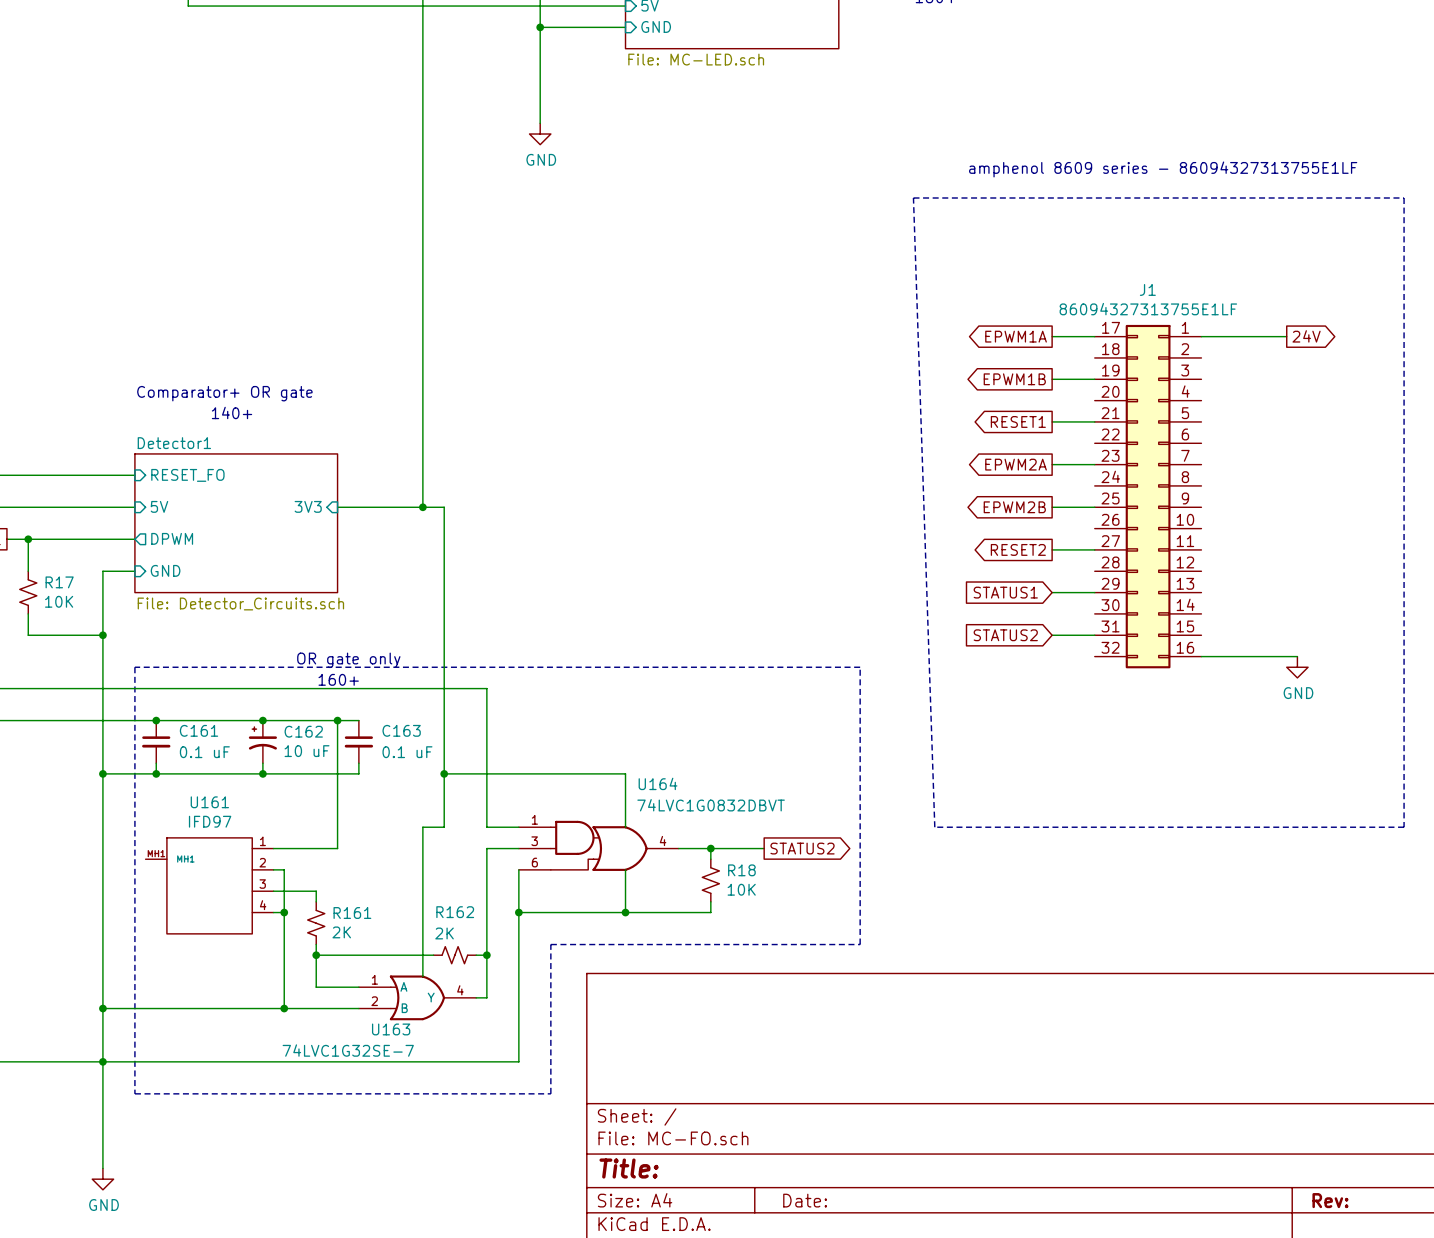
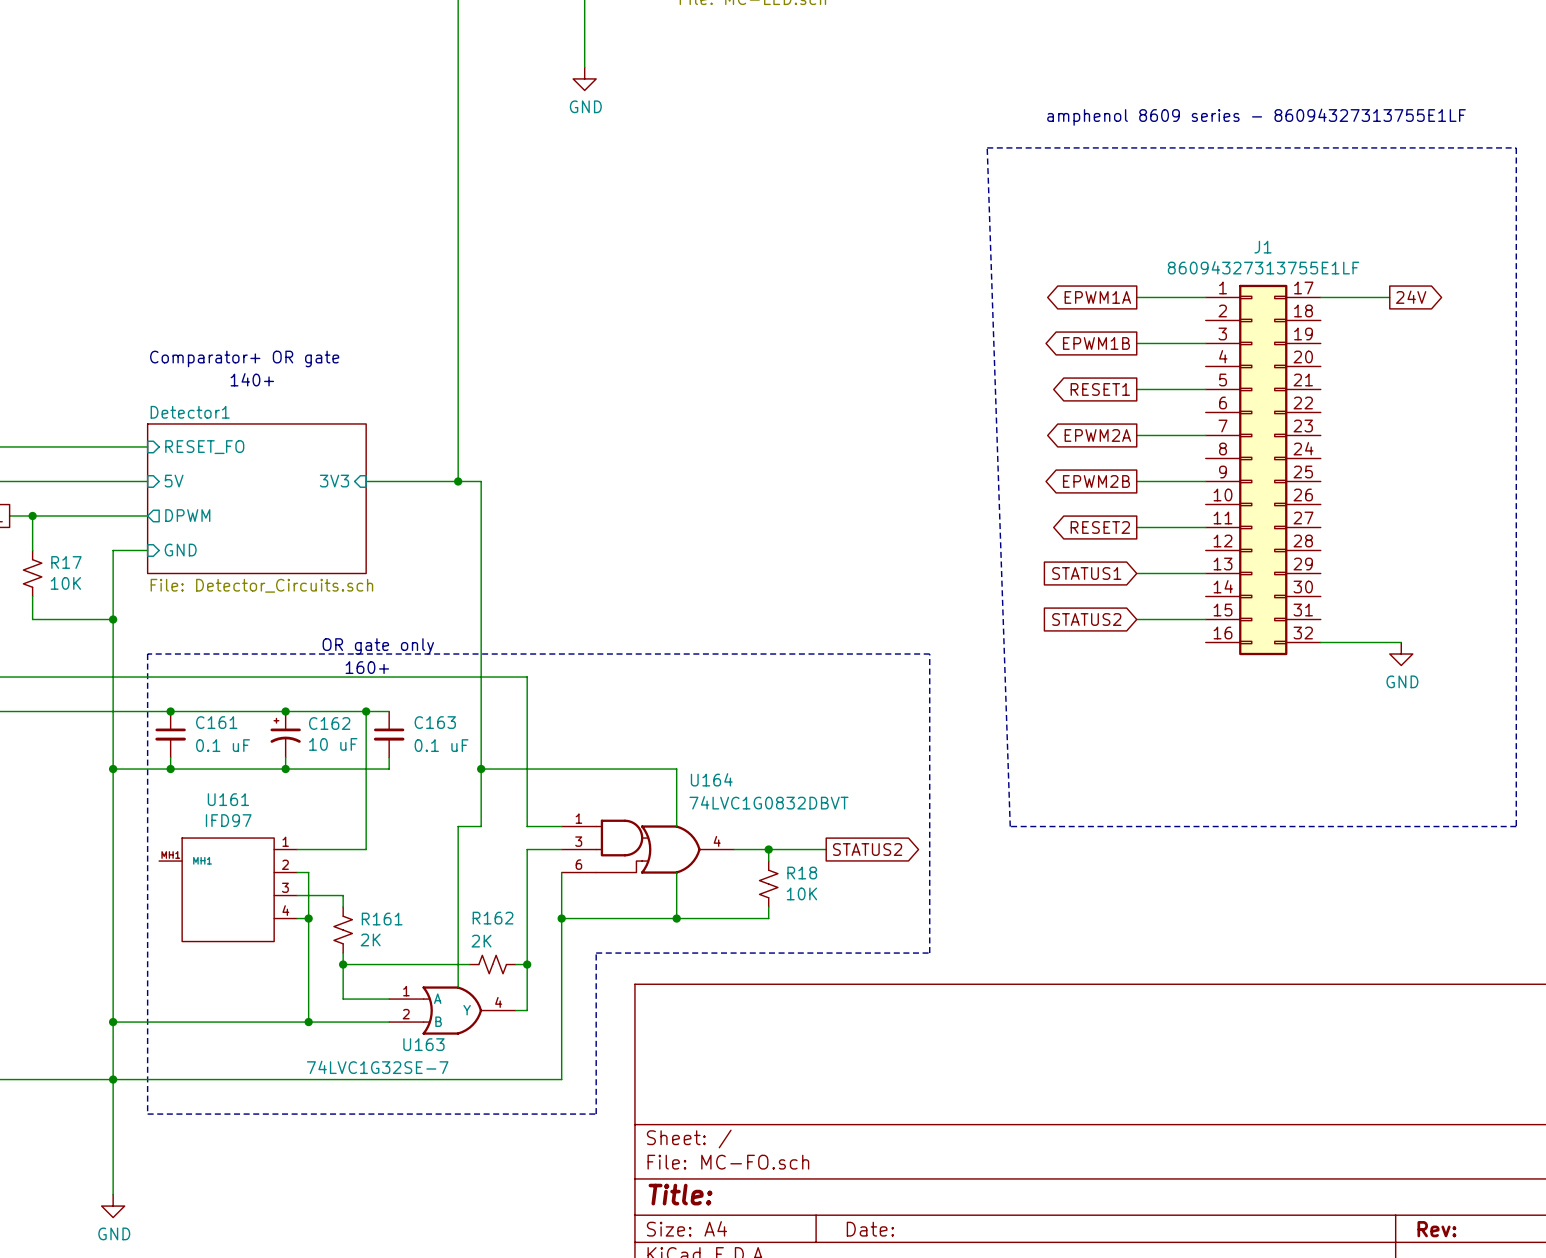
J1 flip: as is (1148, 496) -> left-right (1263, 469)

